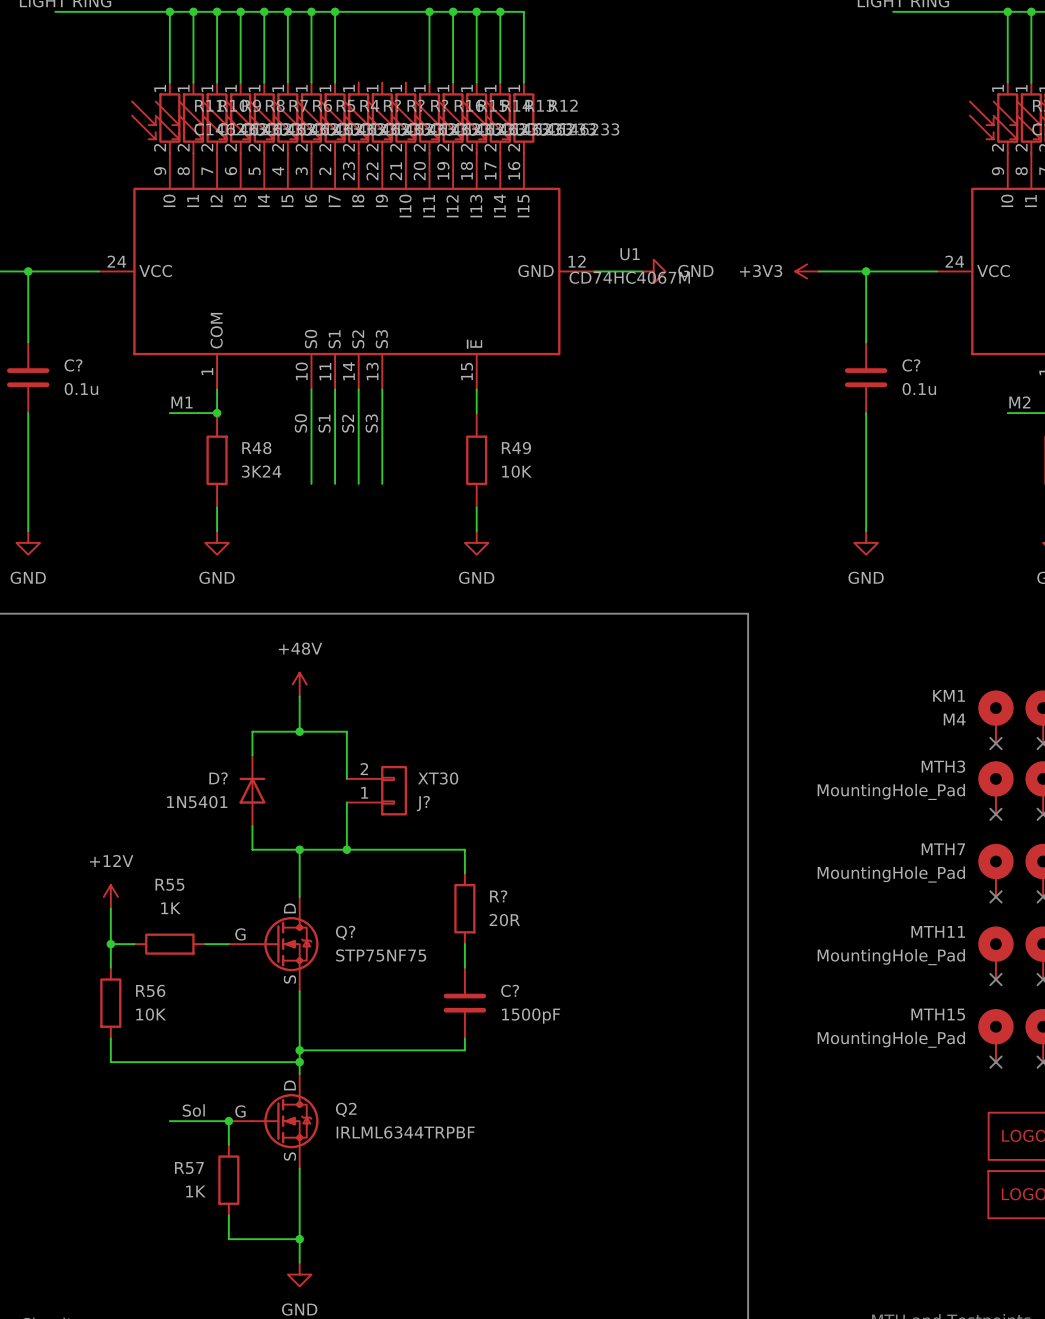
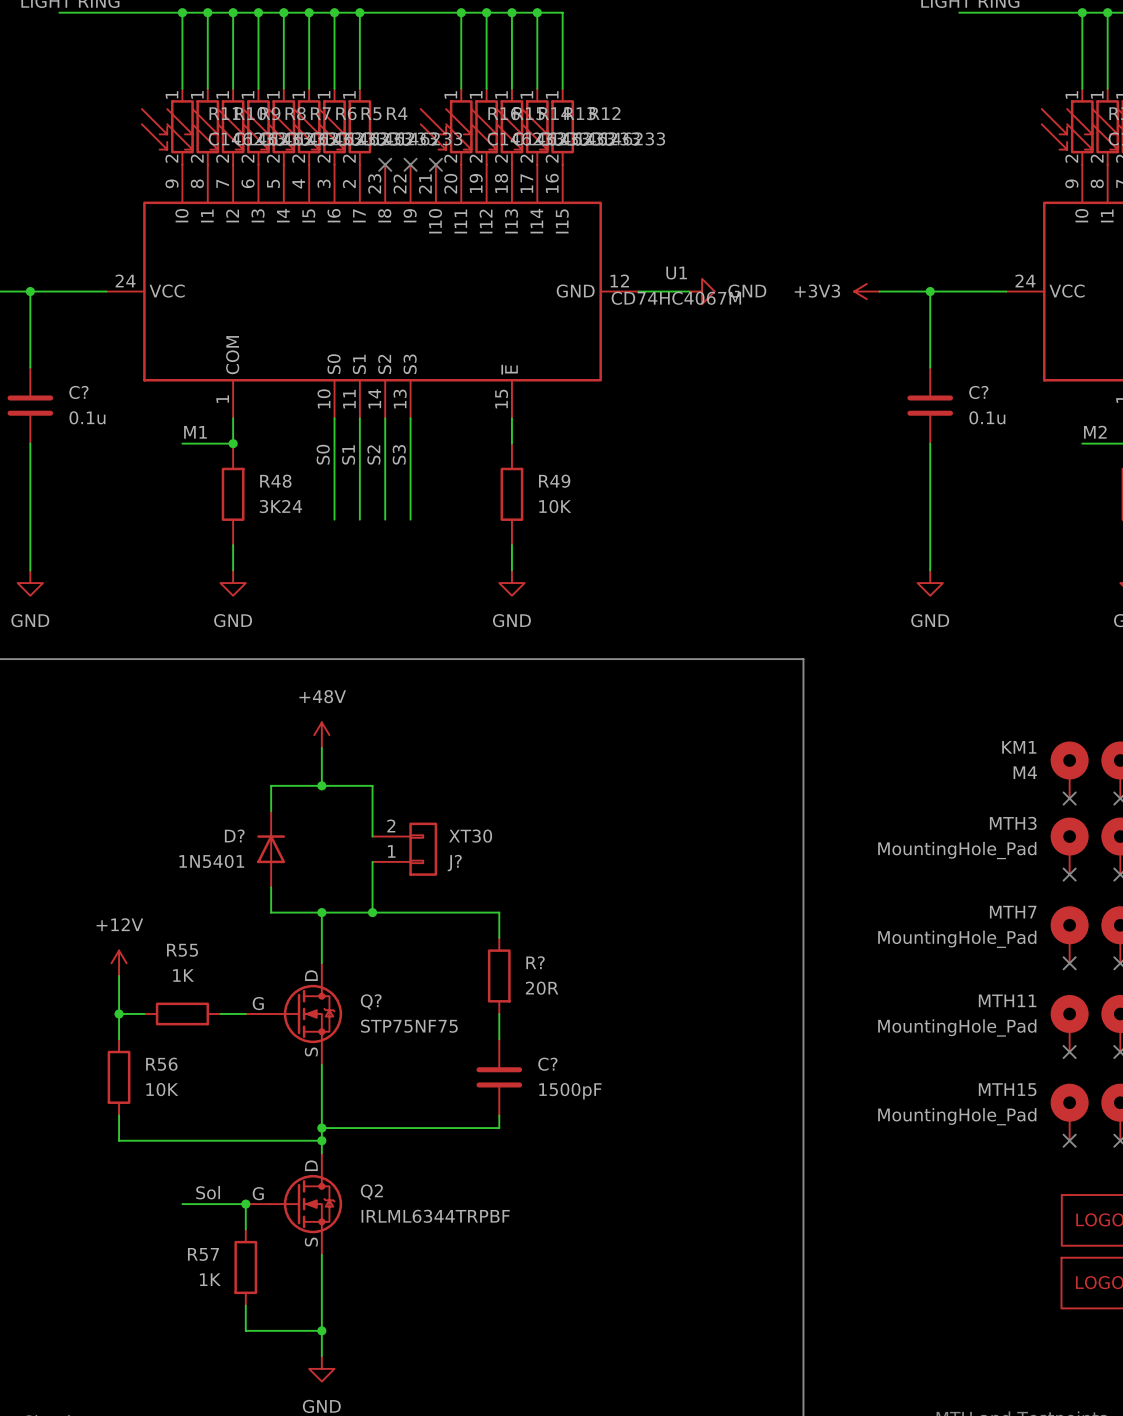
R?: (345, 118) -> none
R?: (368, 118) -> none
R?: (392, 118) -> none
no-connect mark: none -> (385, 164)
no-connect mark: none -> (410, 164)
no-connect mark: none -> (435, 164)

